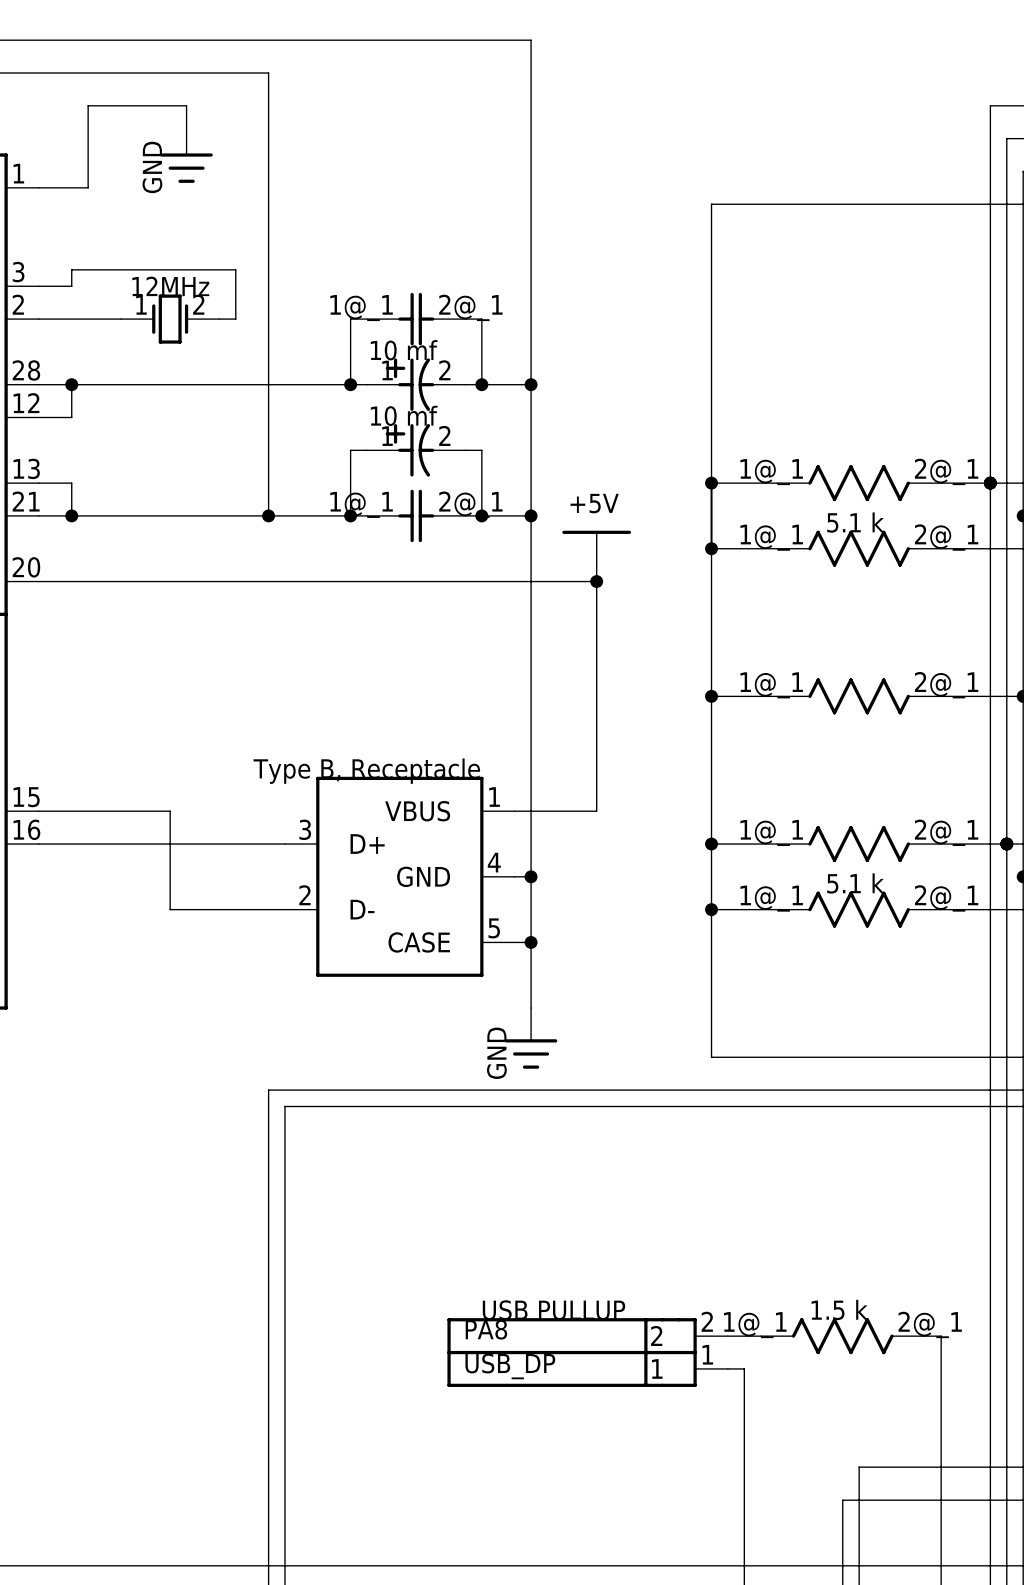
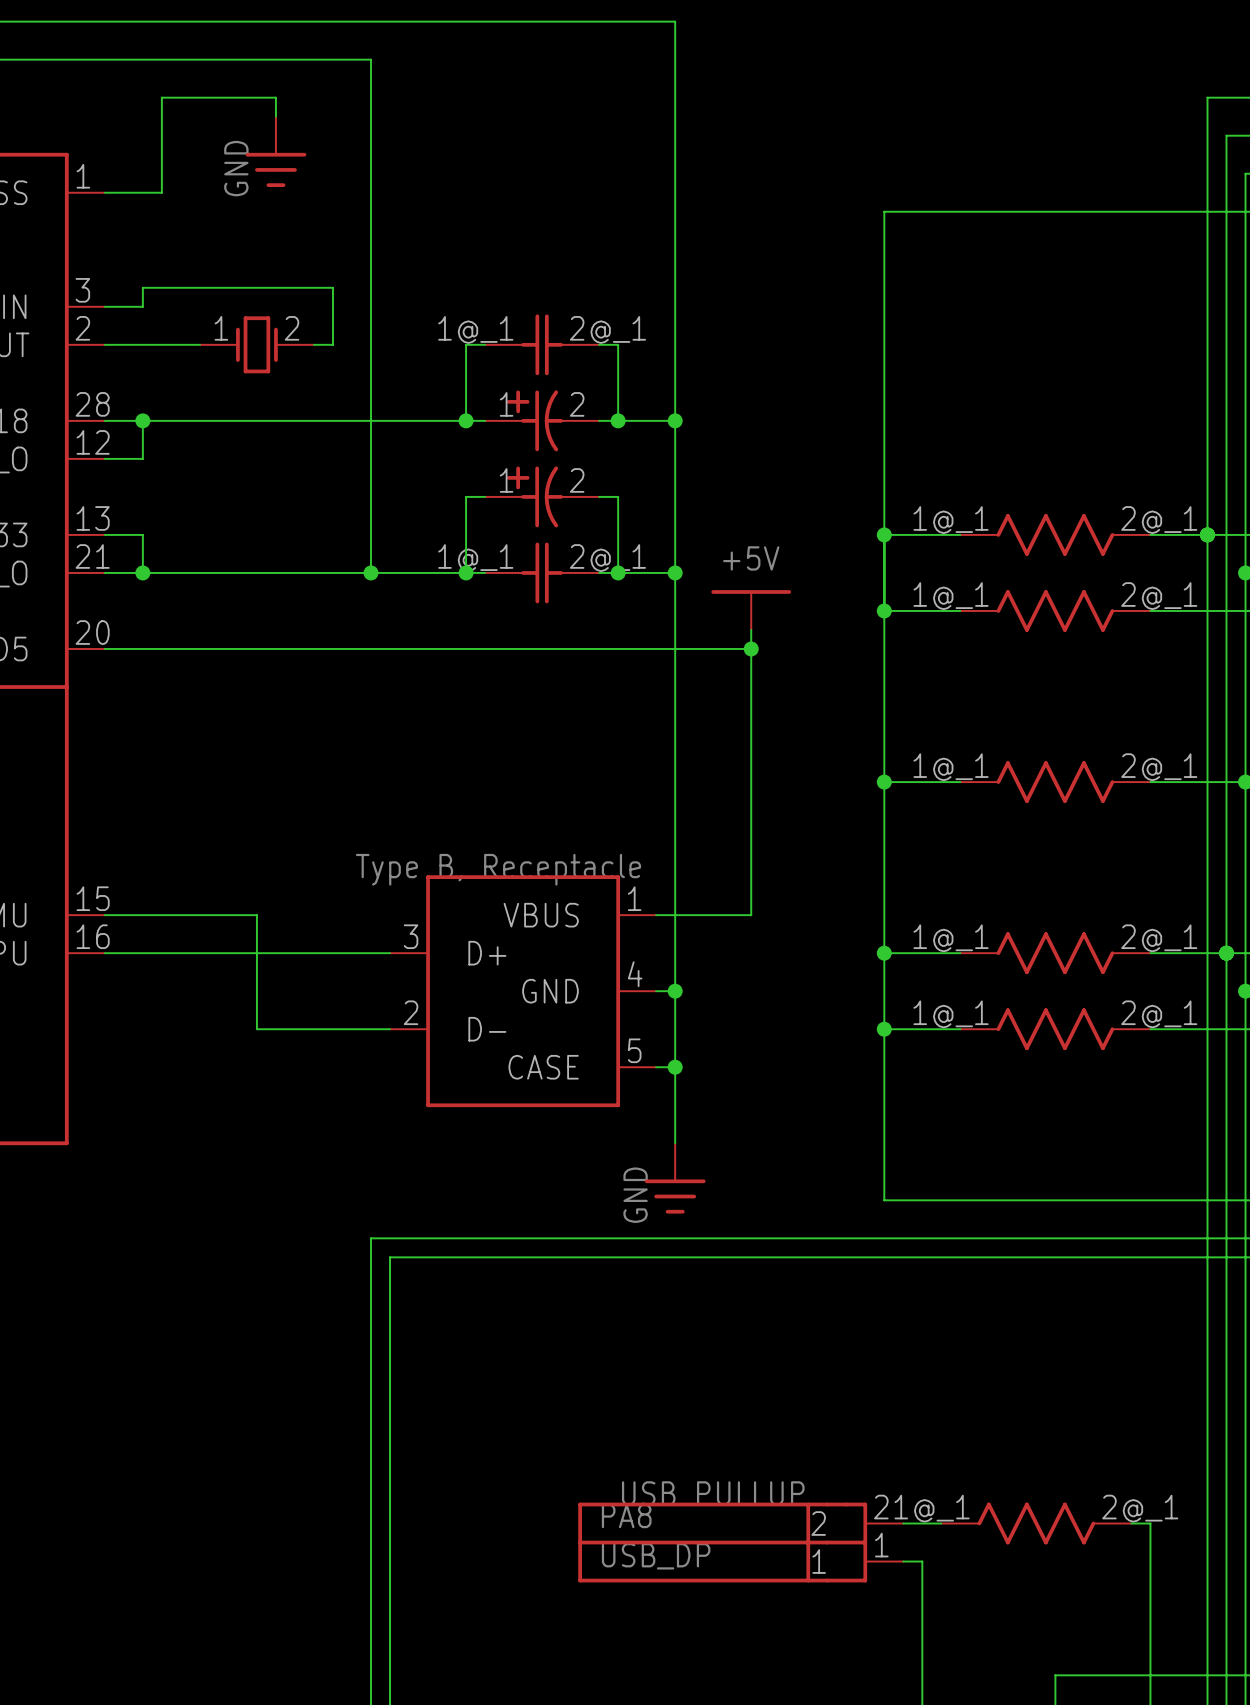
text: 12MHz (170, 286) -> none
text: 10 mf (404, 350) -> none
text: 10 mf (404, 415) -> none
text: 5.1 k (855, 522) -> none
text: 5.1 k (855, 883) -> none
text: 1.5 k (839, 1309) -> none

